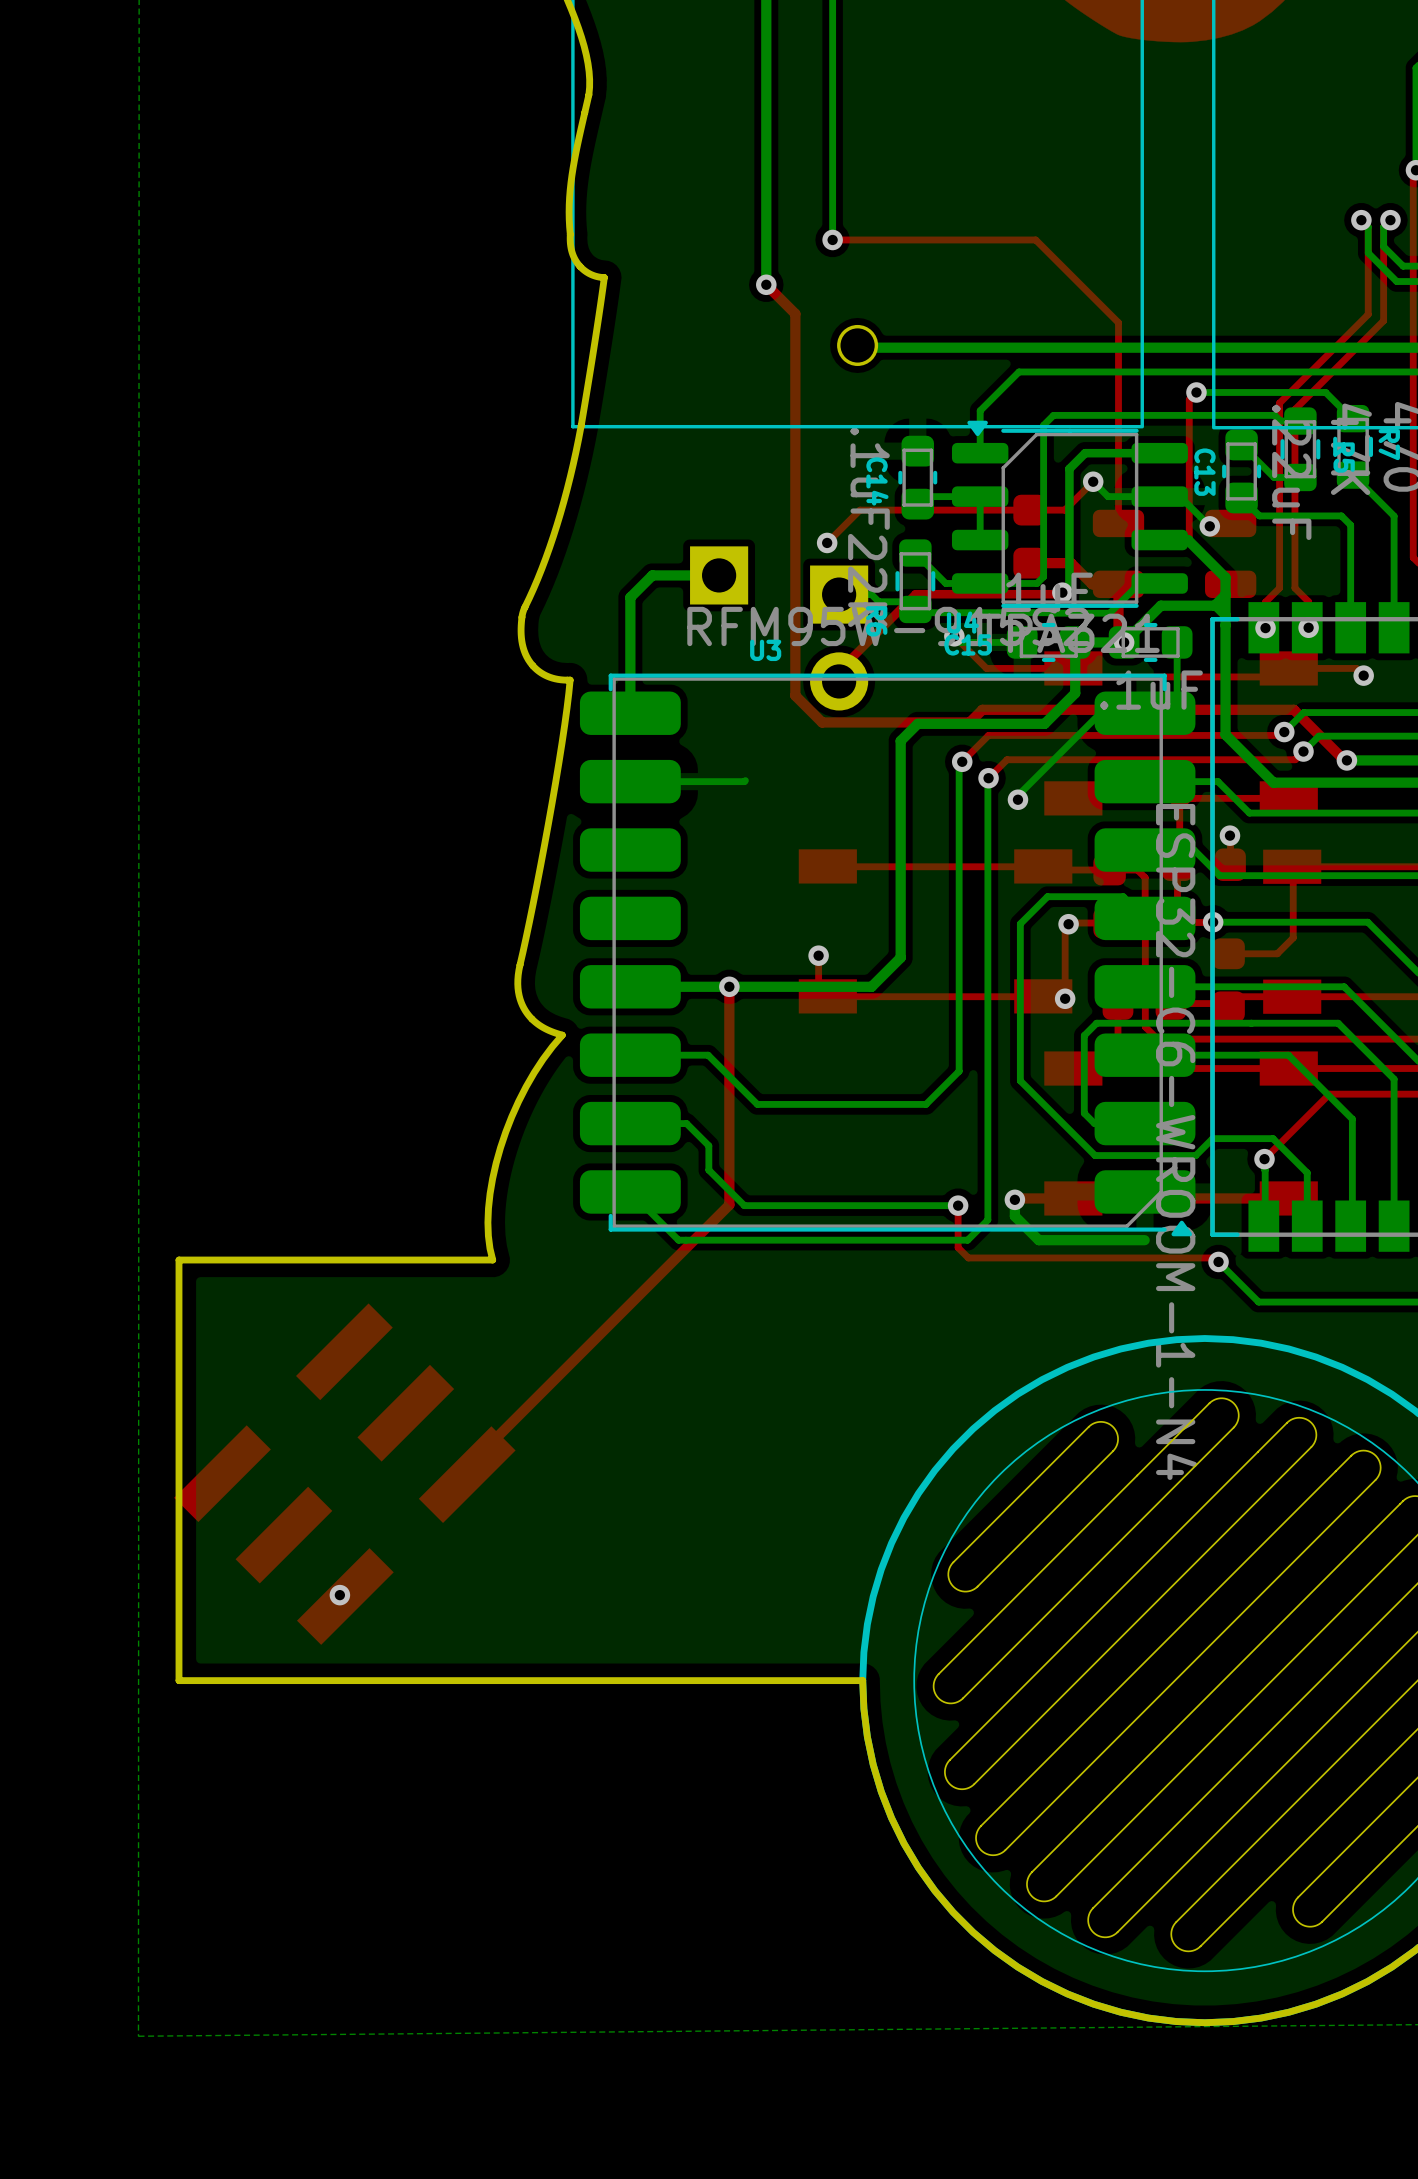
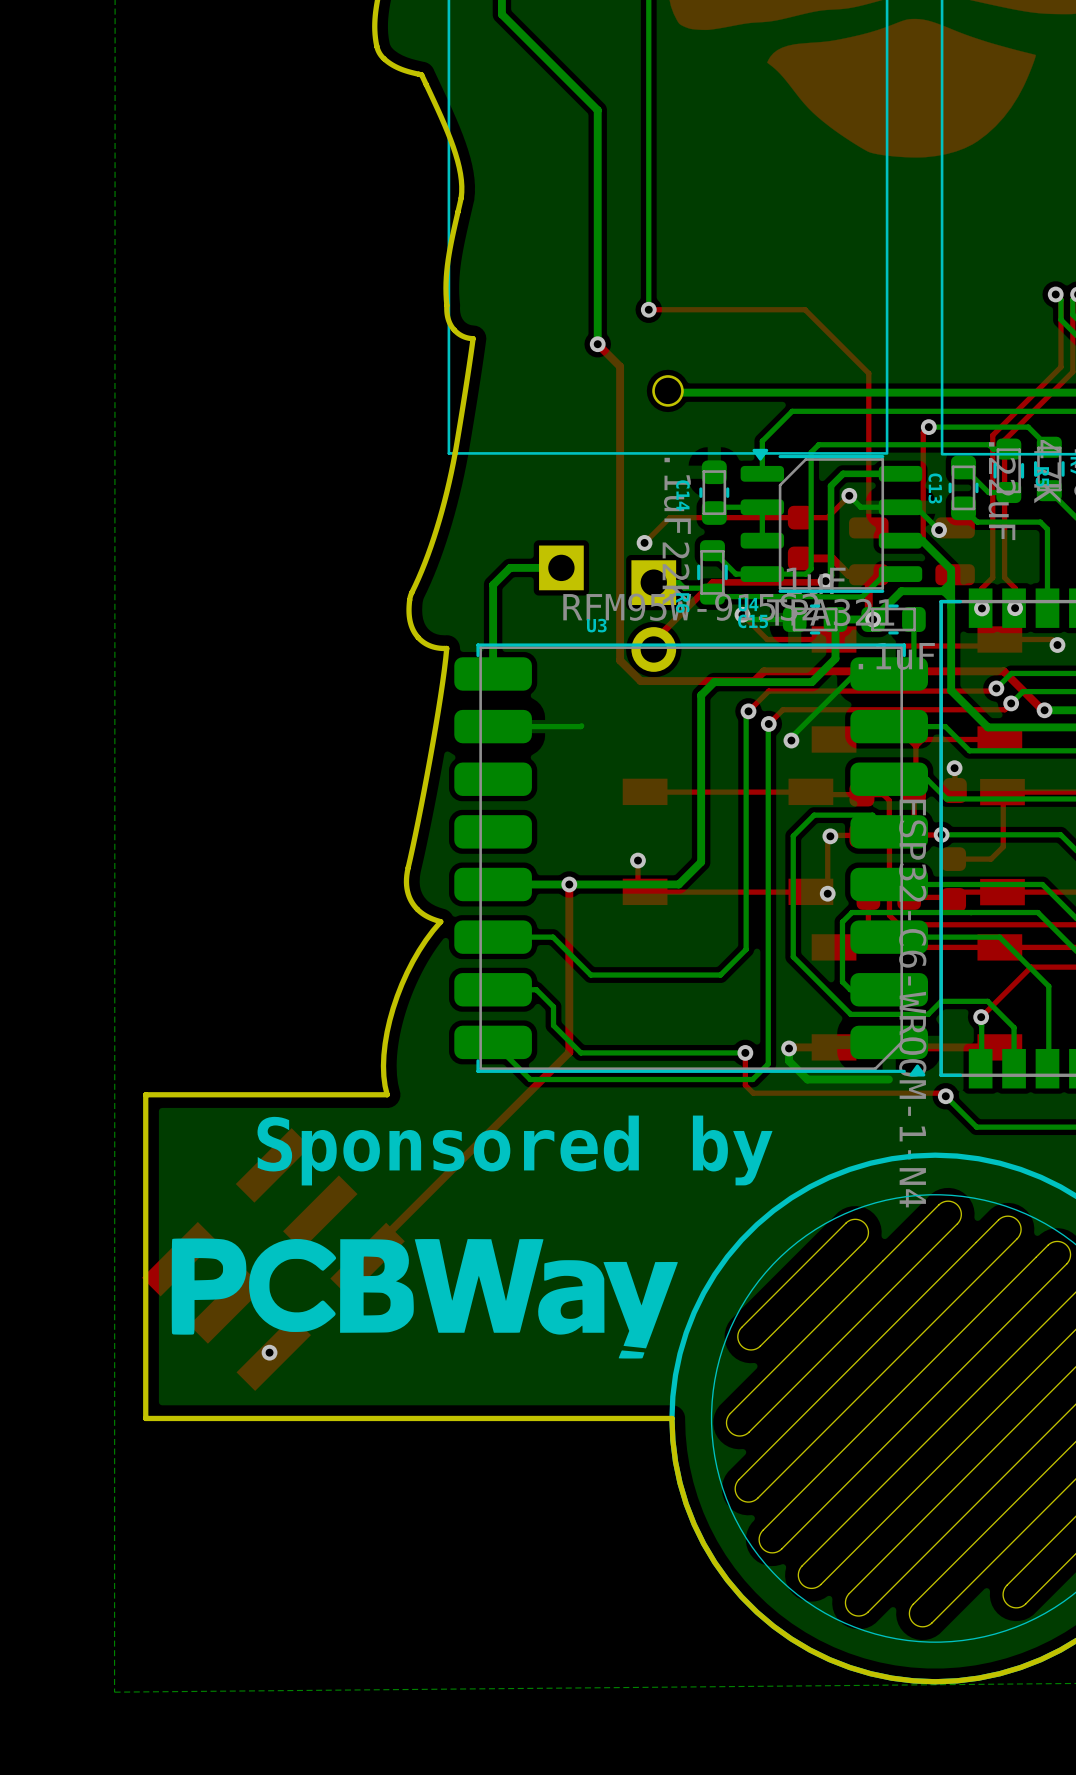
text: none -> Sponsored by (515, 1150)
drawing: none -> [171, 1238, 678, 1359]

